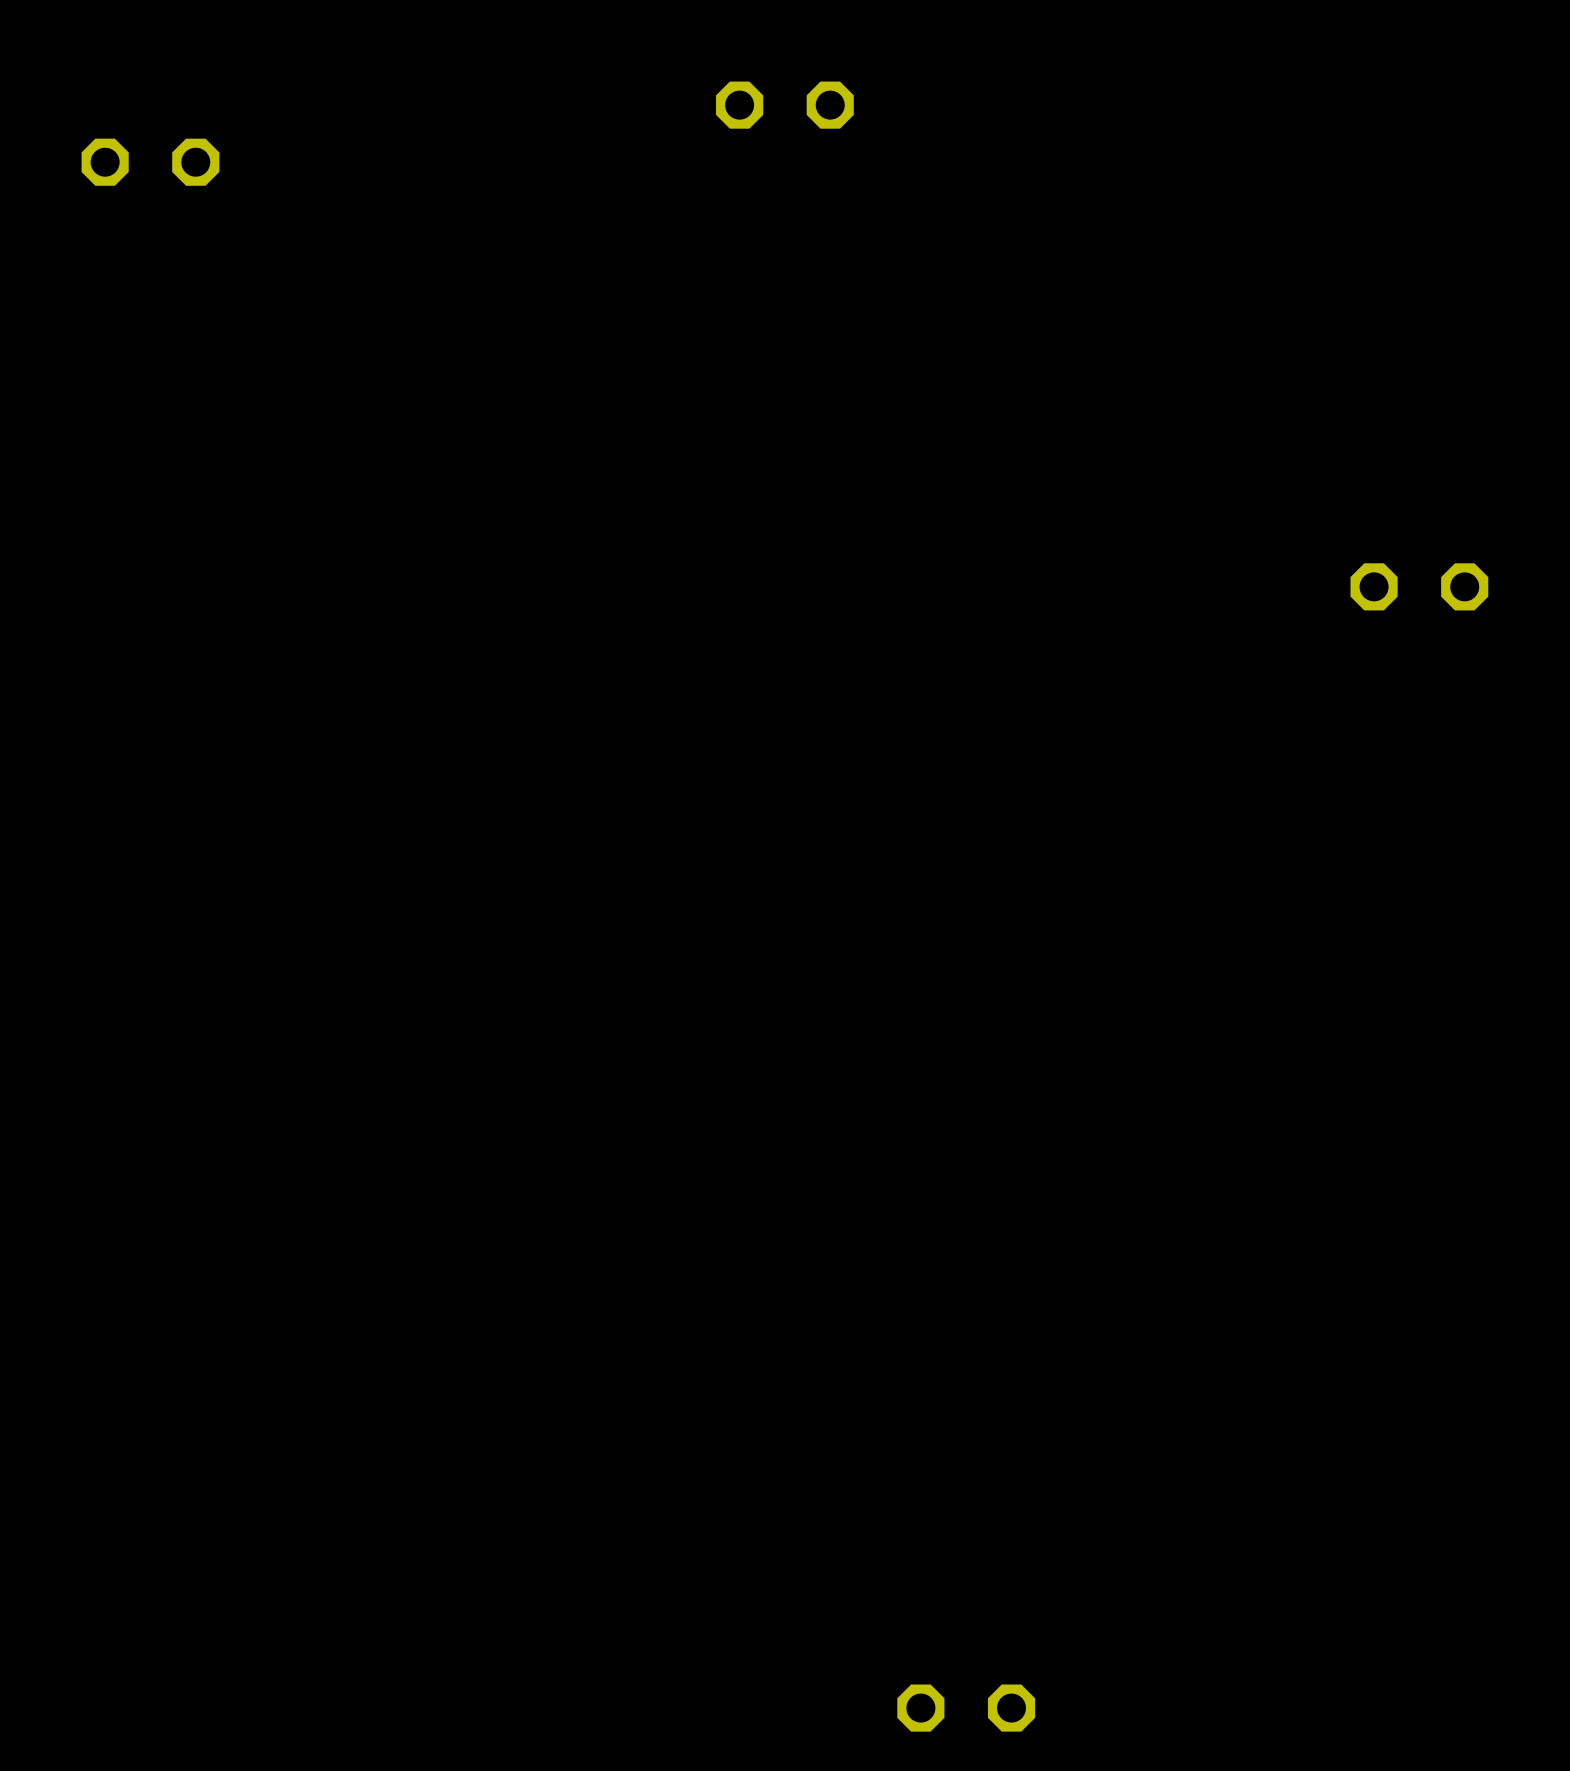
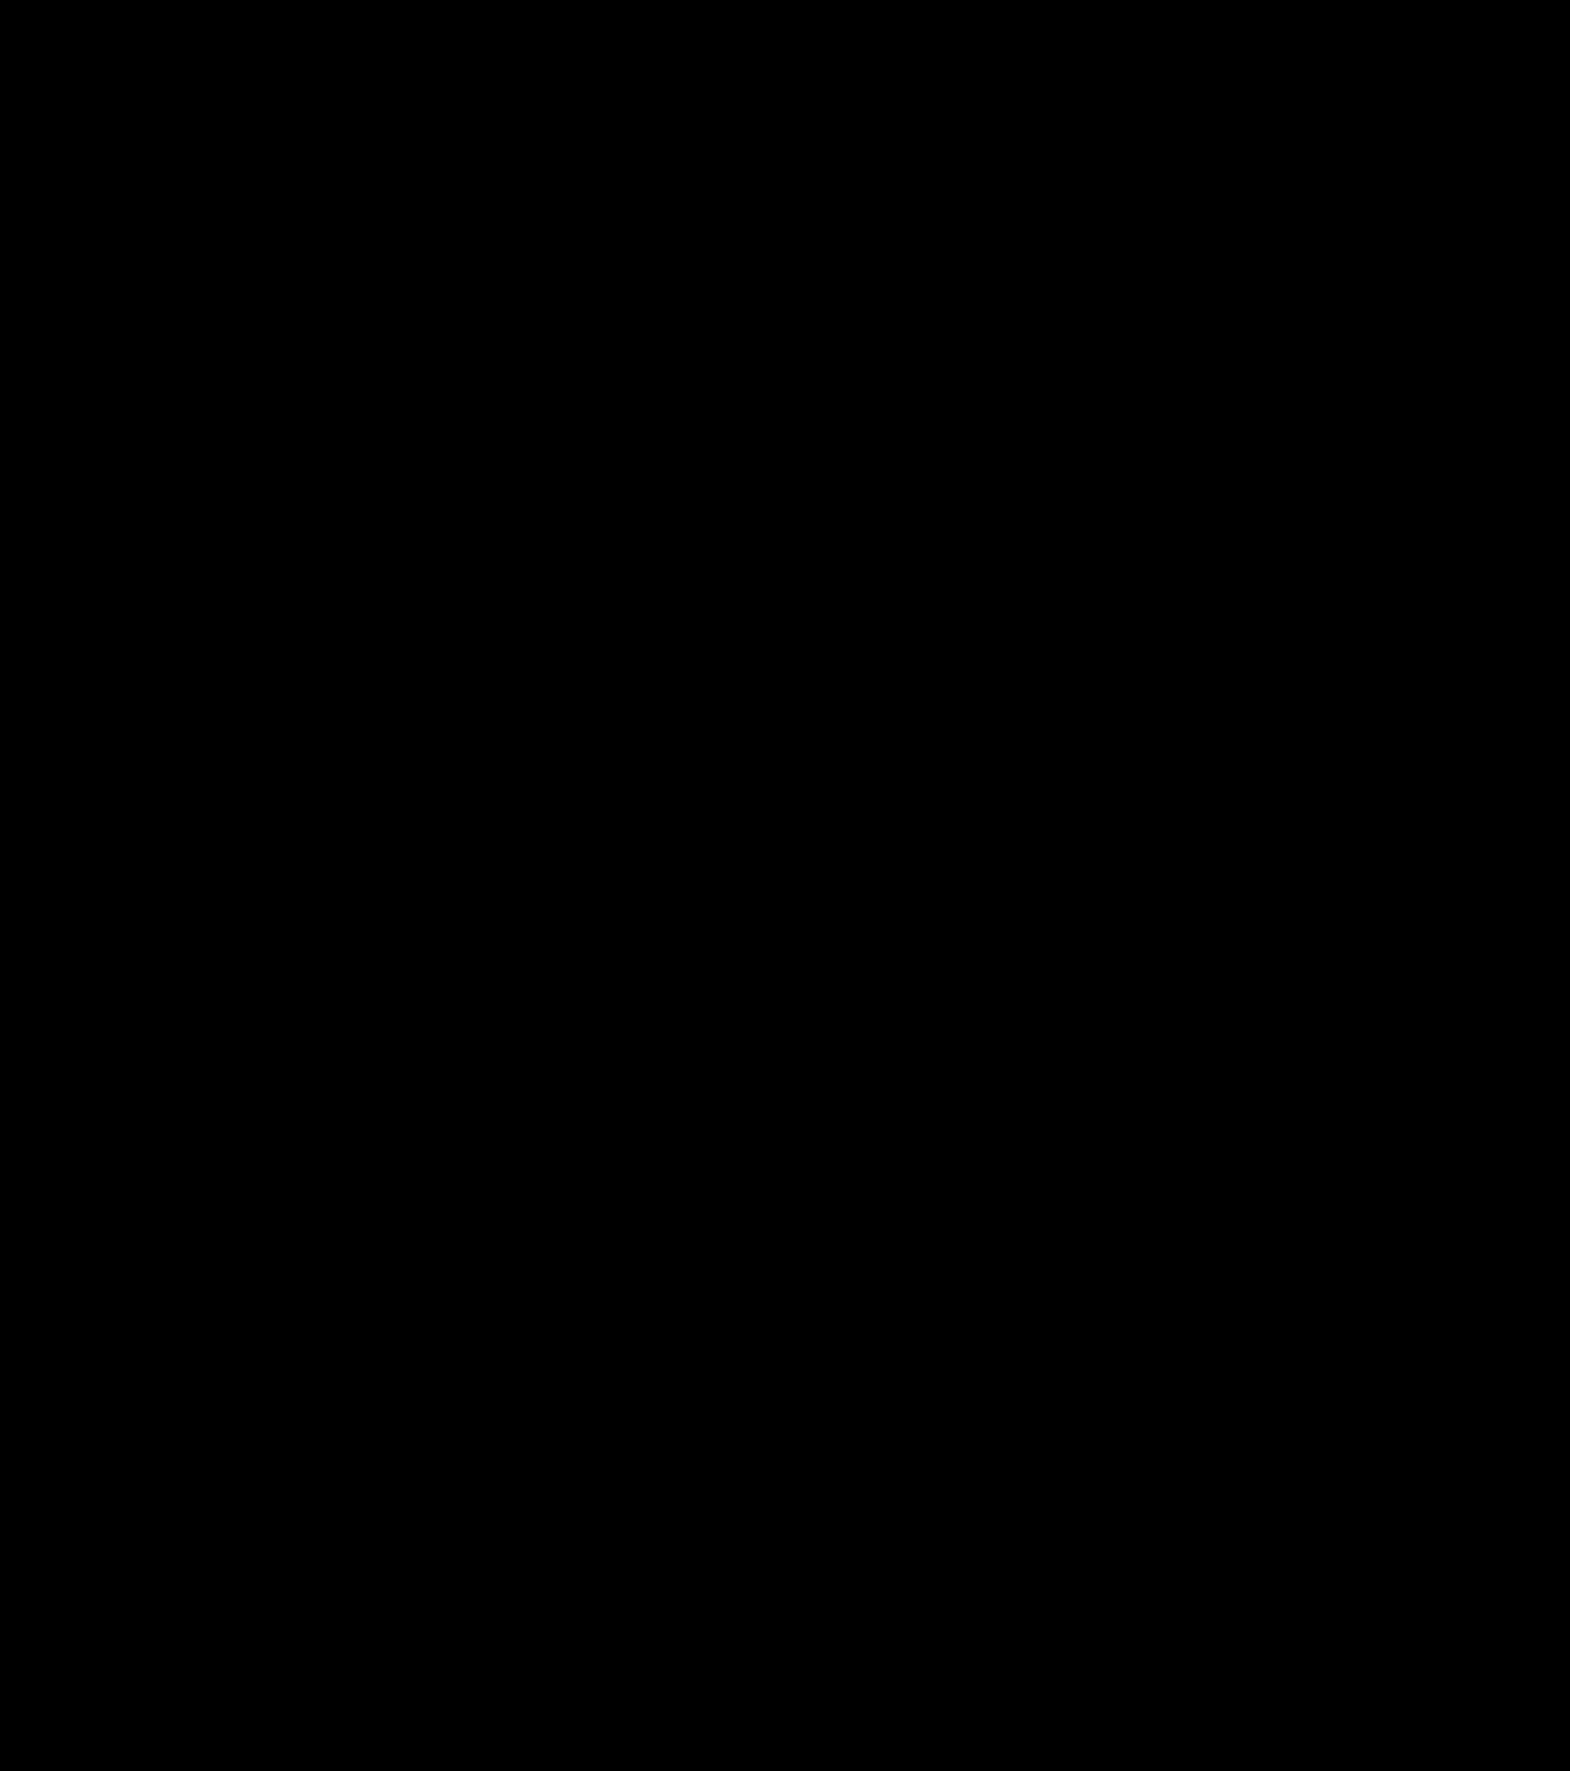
part: (784, 105) -> none
part: (150, 162) -> none
part: (1419, 586) -> none
part: (966, 1708) -> none

